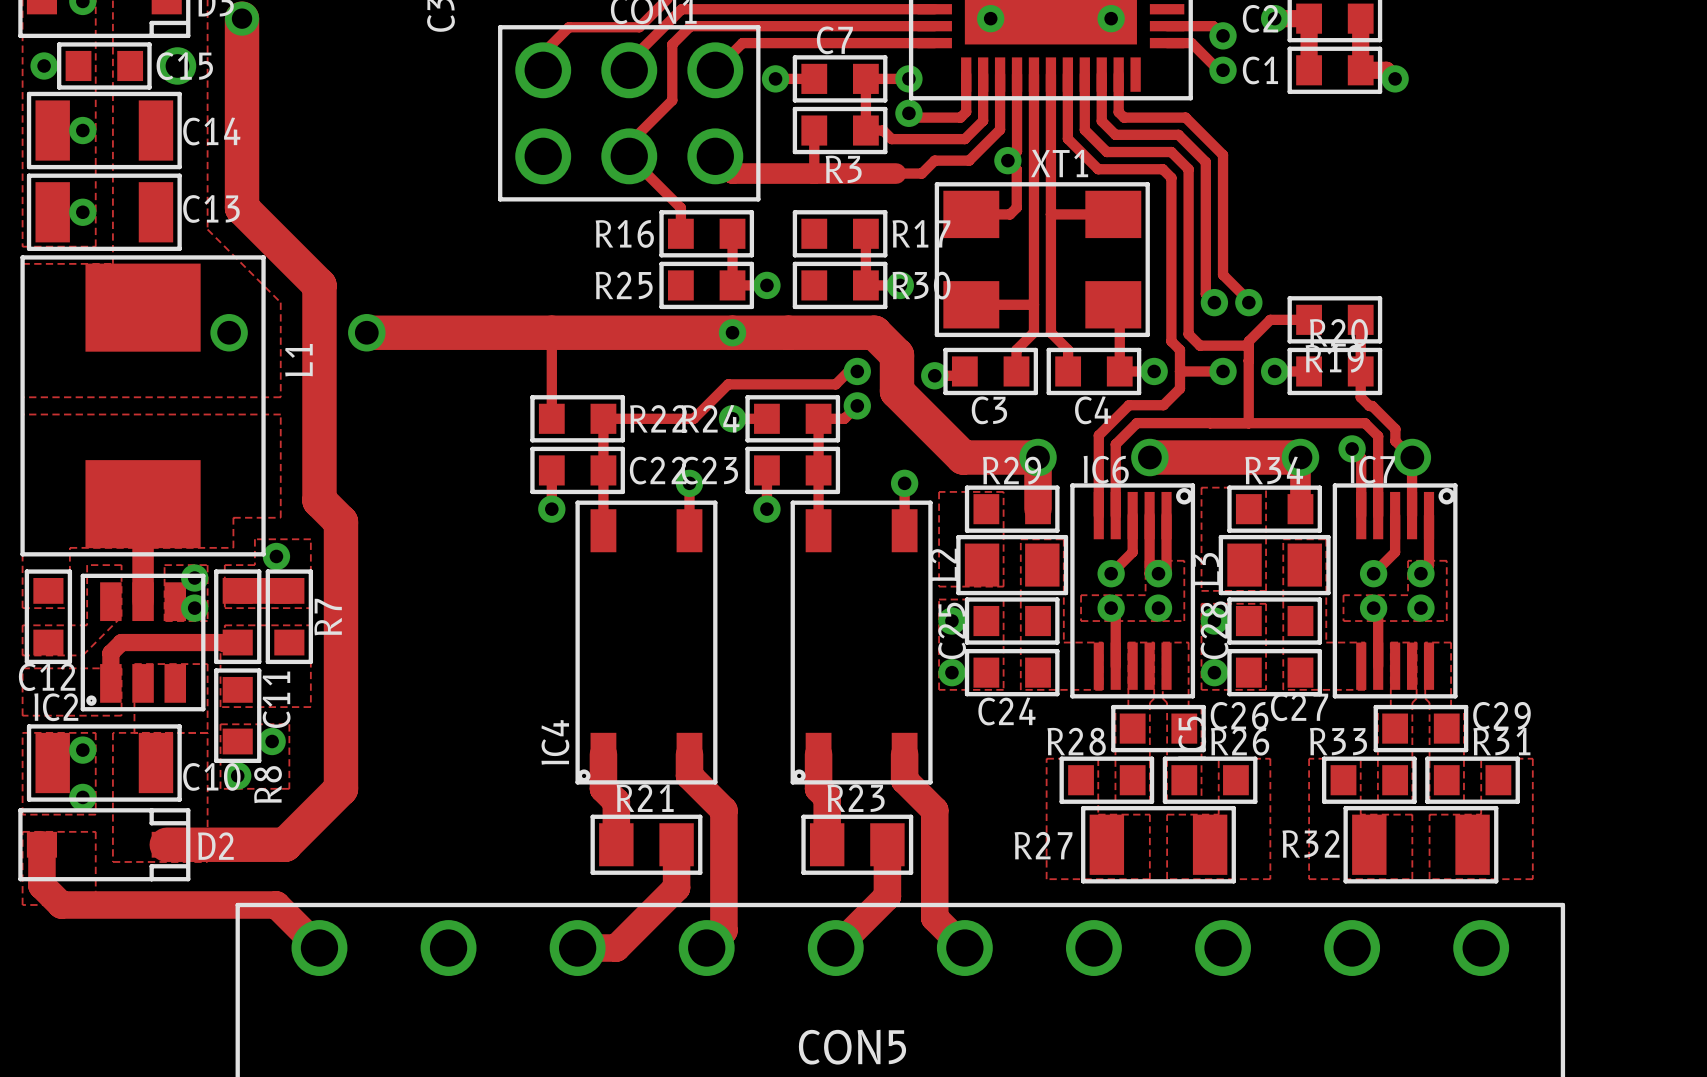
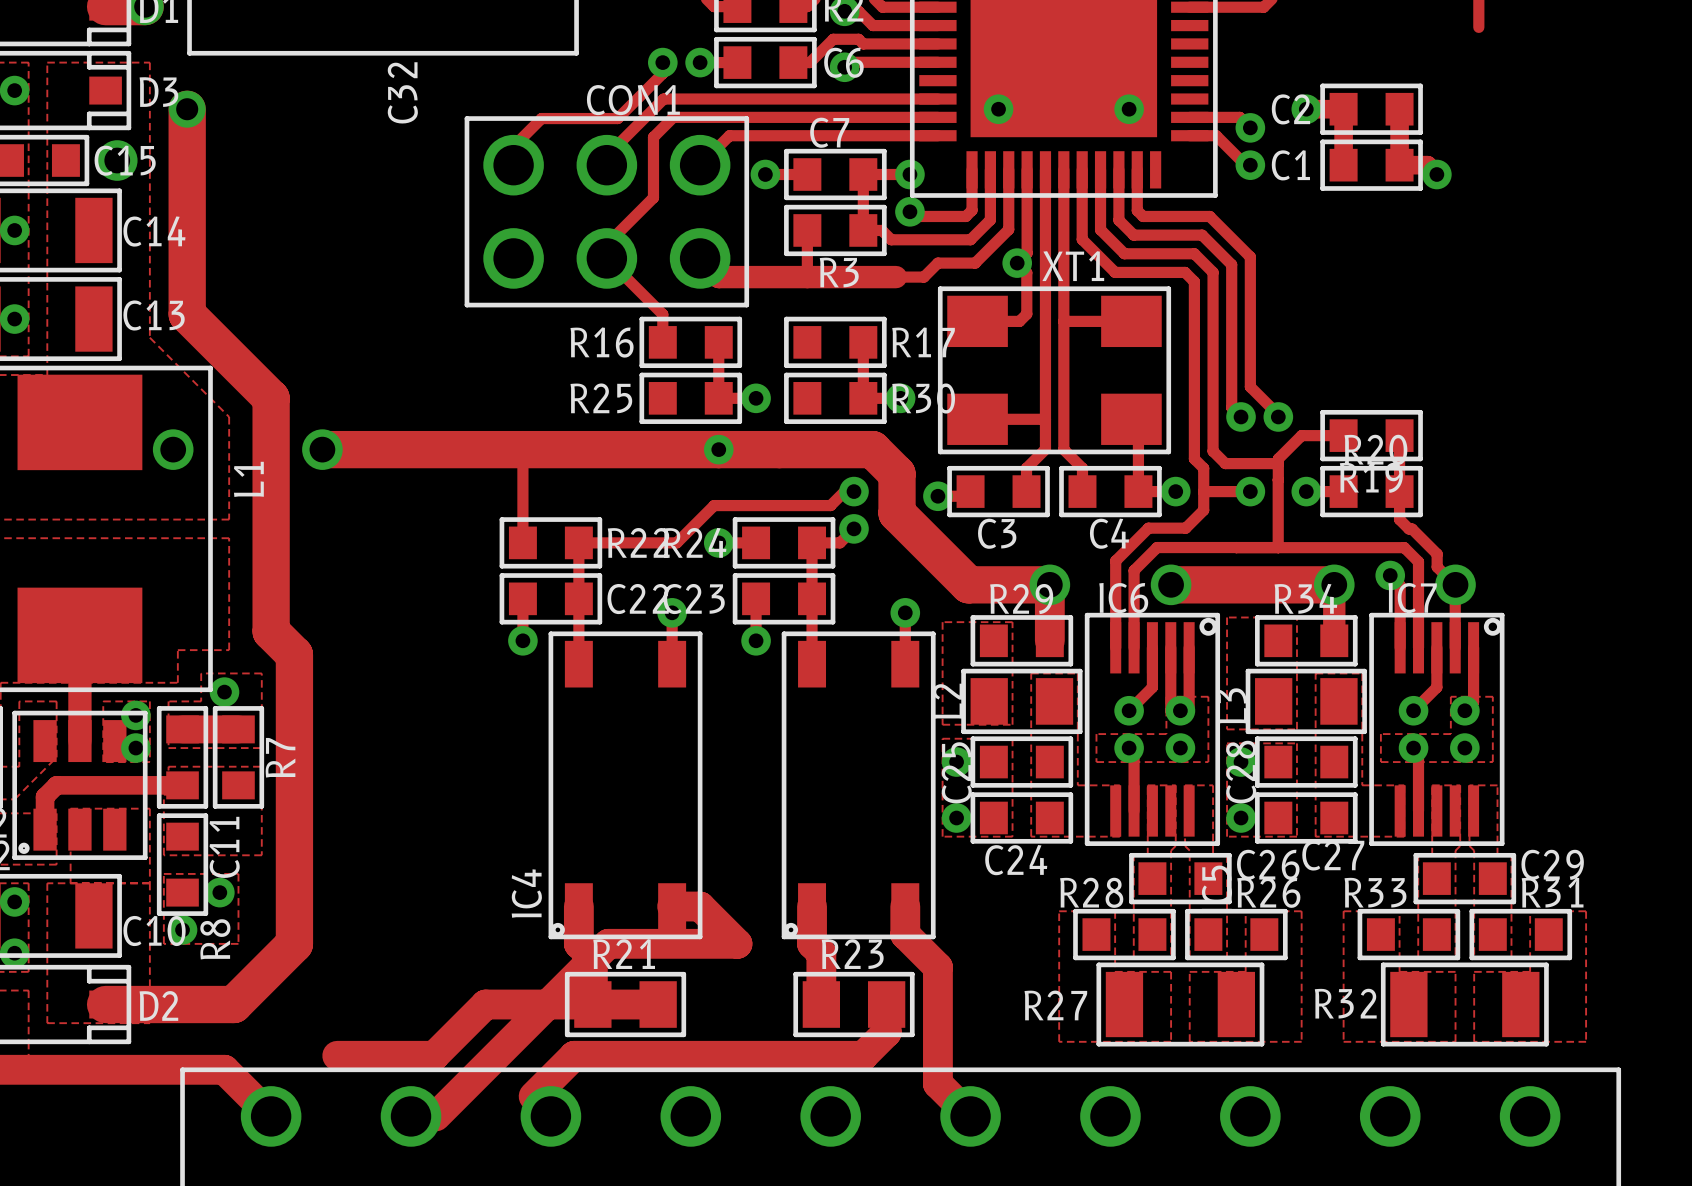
track: (689, 754) (689, 775) (723, 810) (723, 930) (706, 948) -> (672, 906) (700, 906) (737, 943) (608, 943) (435, 1116)
track: (676, 844) (676, 887) (616, 948) (577, 948) -> (658, 1004) (485, 1004) (434, 1055) (337, 1055)
track: (887, 870) (887, 896) (835, 948) -> (886, 1032) (863, 1055) (574, 1055) (533, 1096)

